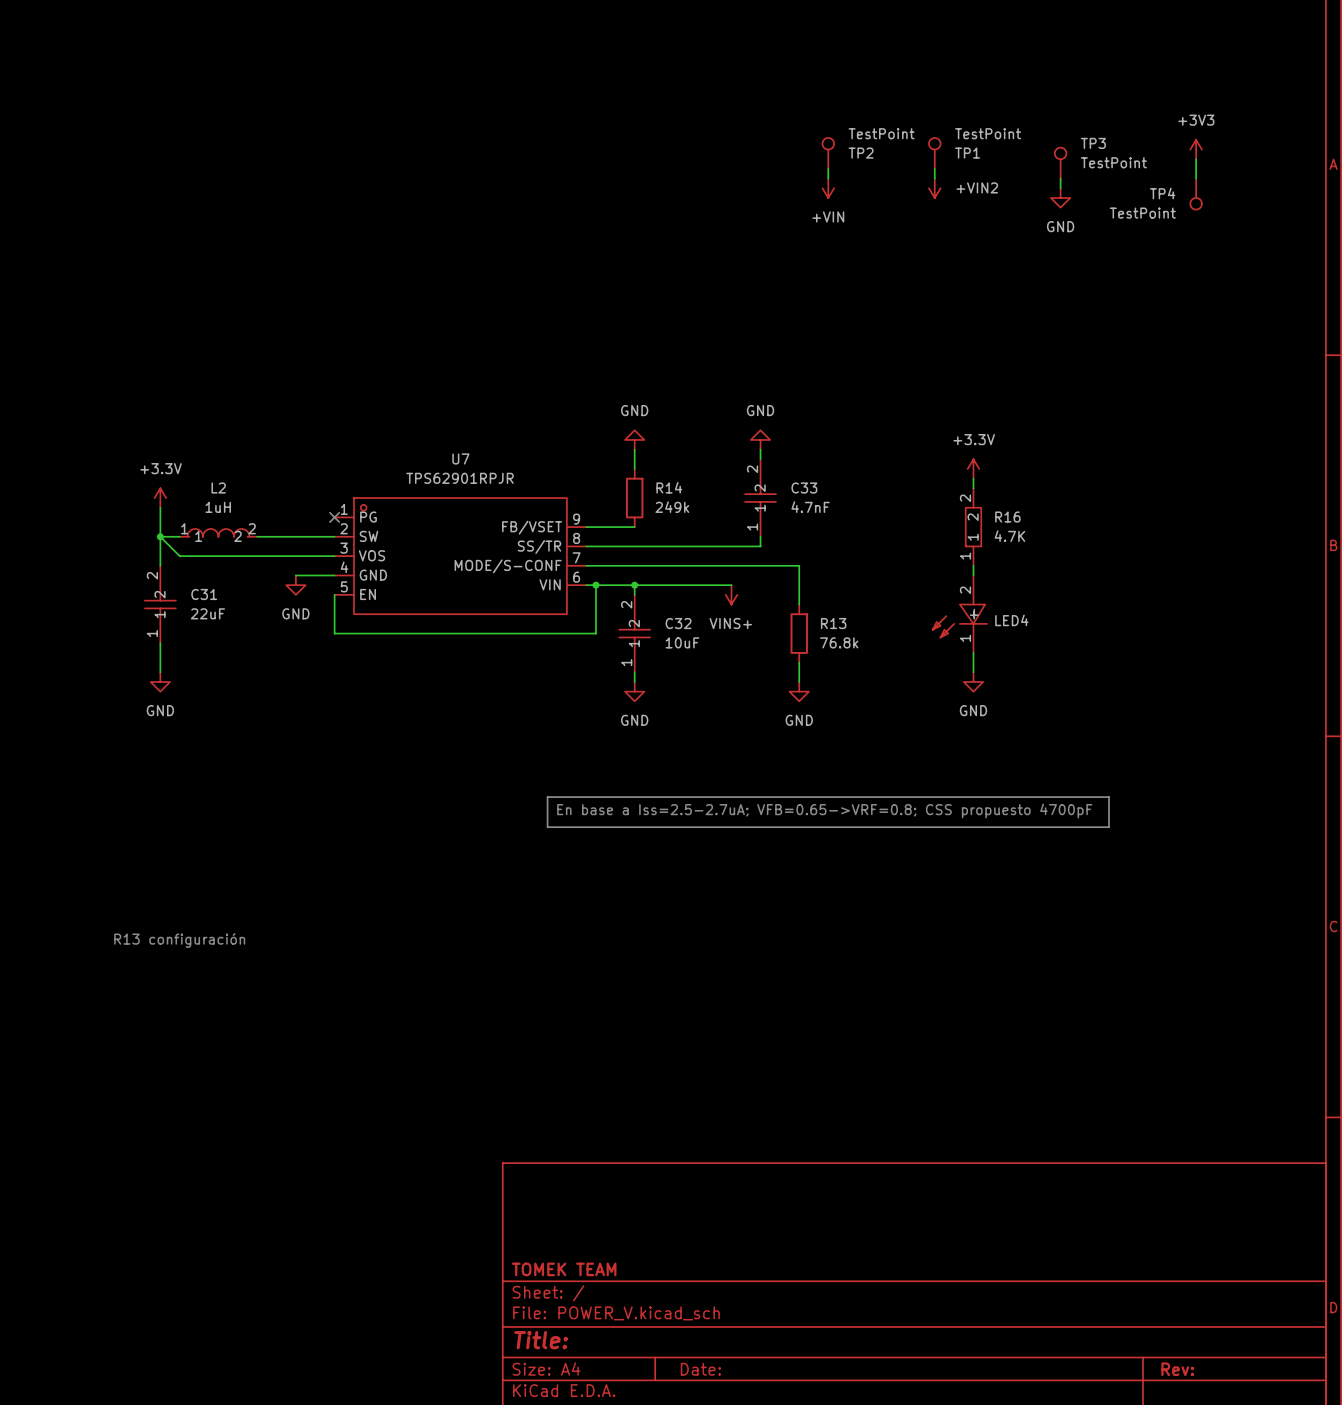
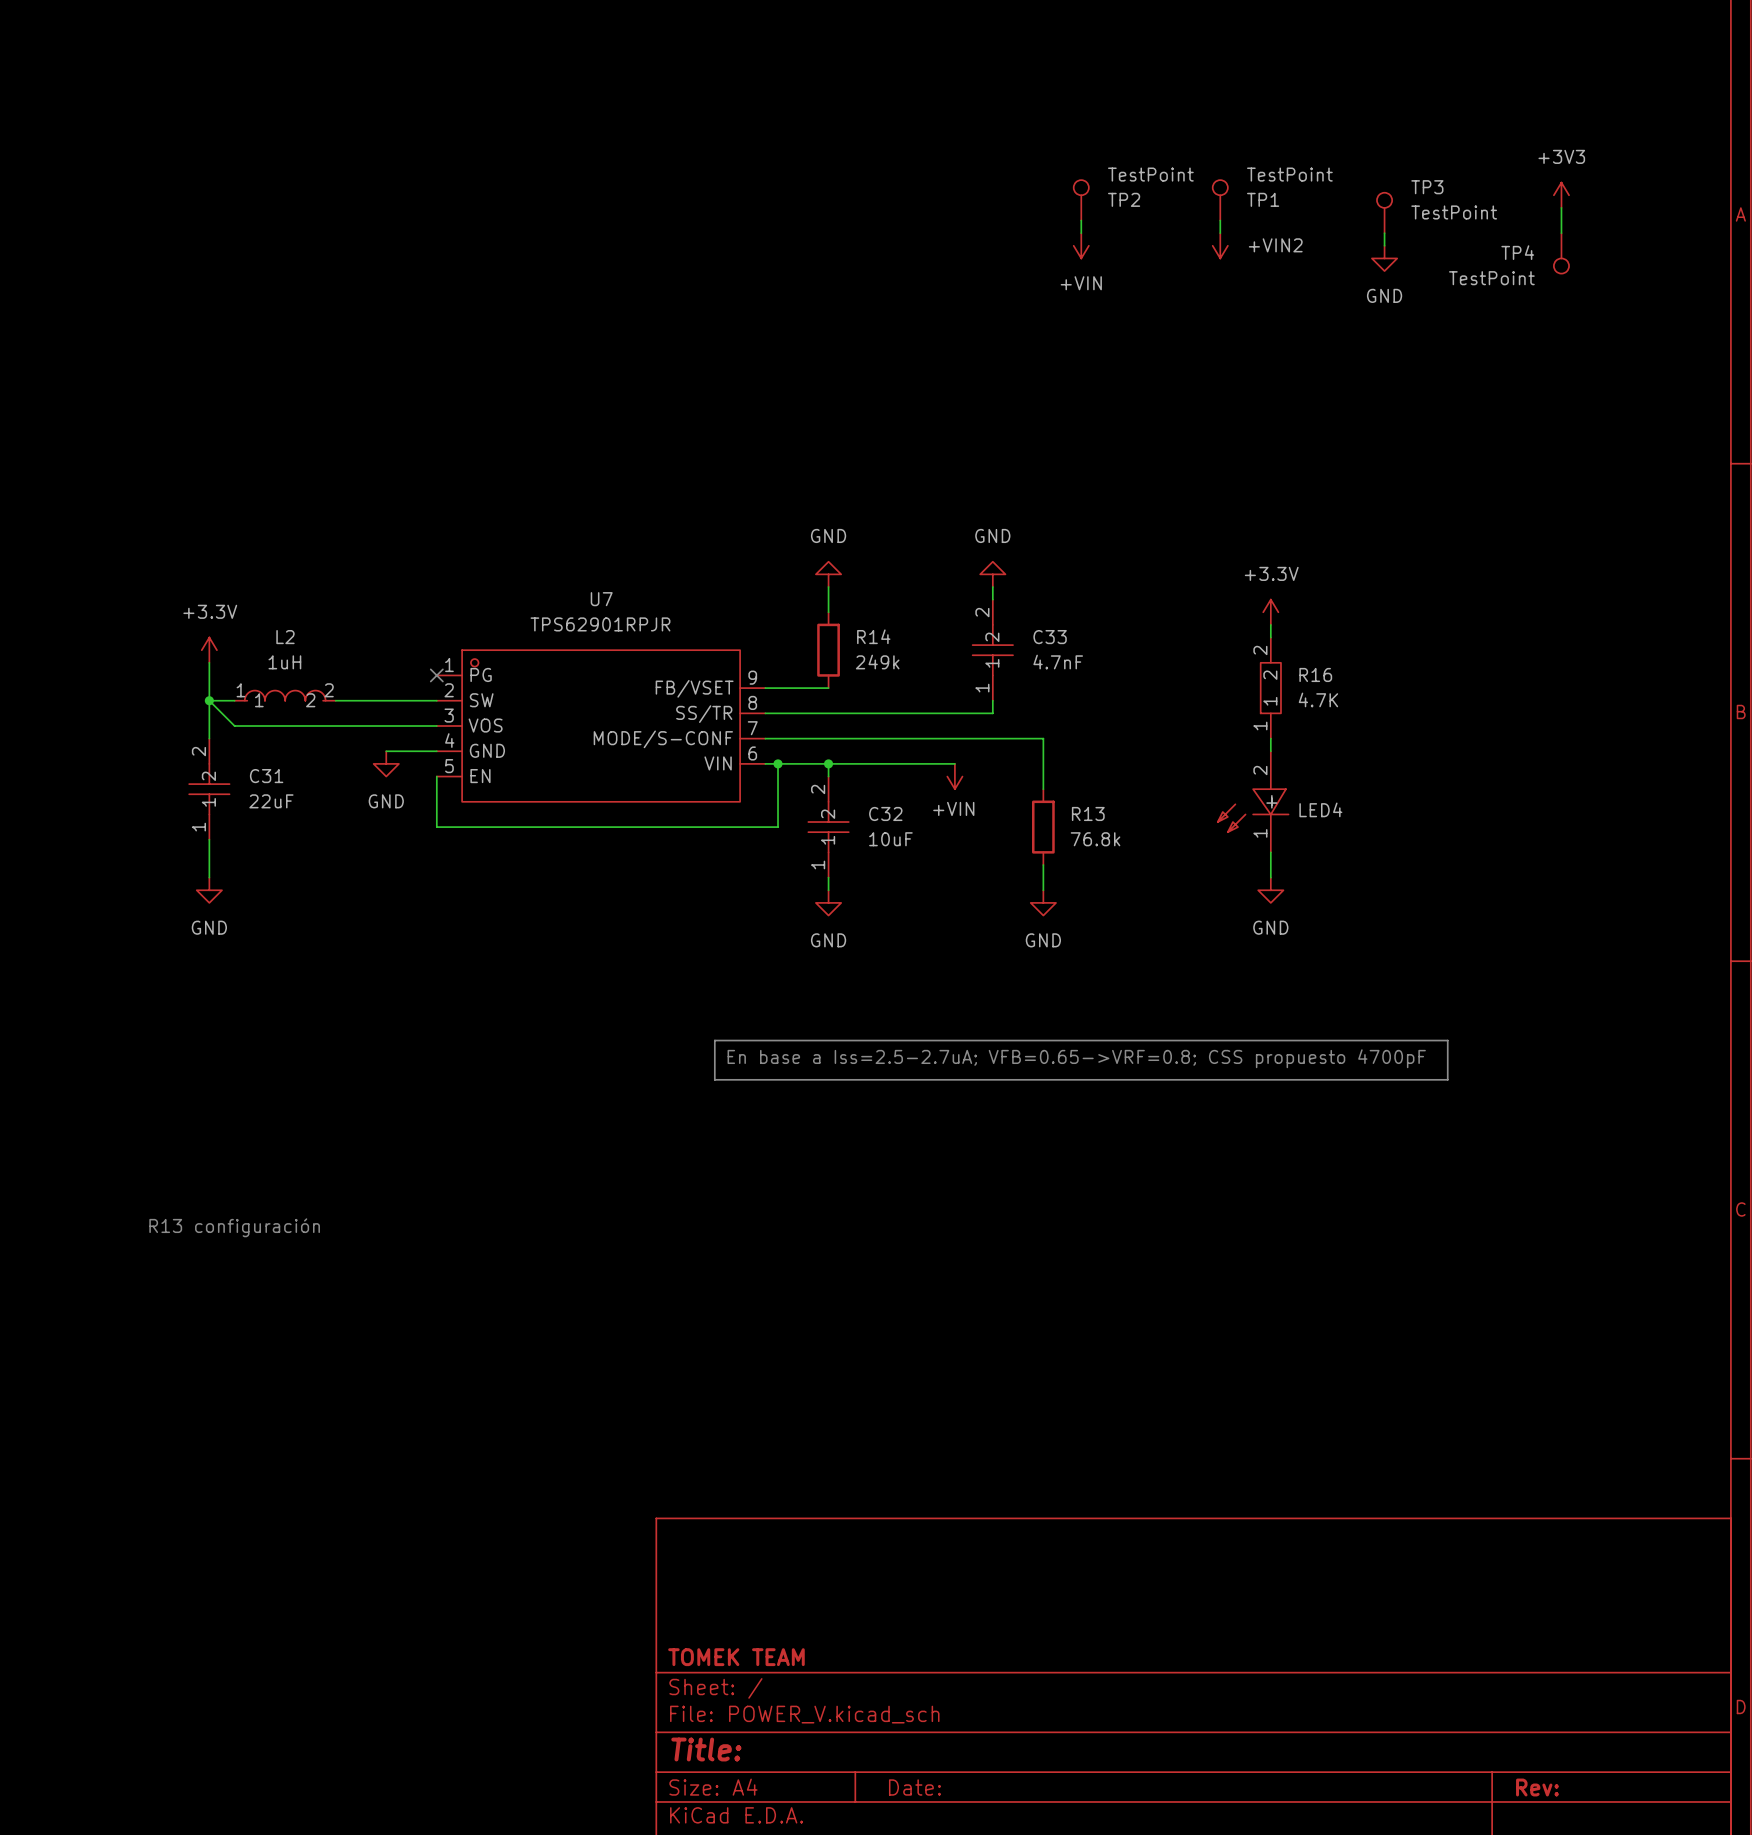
power symbol: VINS+ (731, 594) -> +VIN (954, 776)

